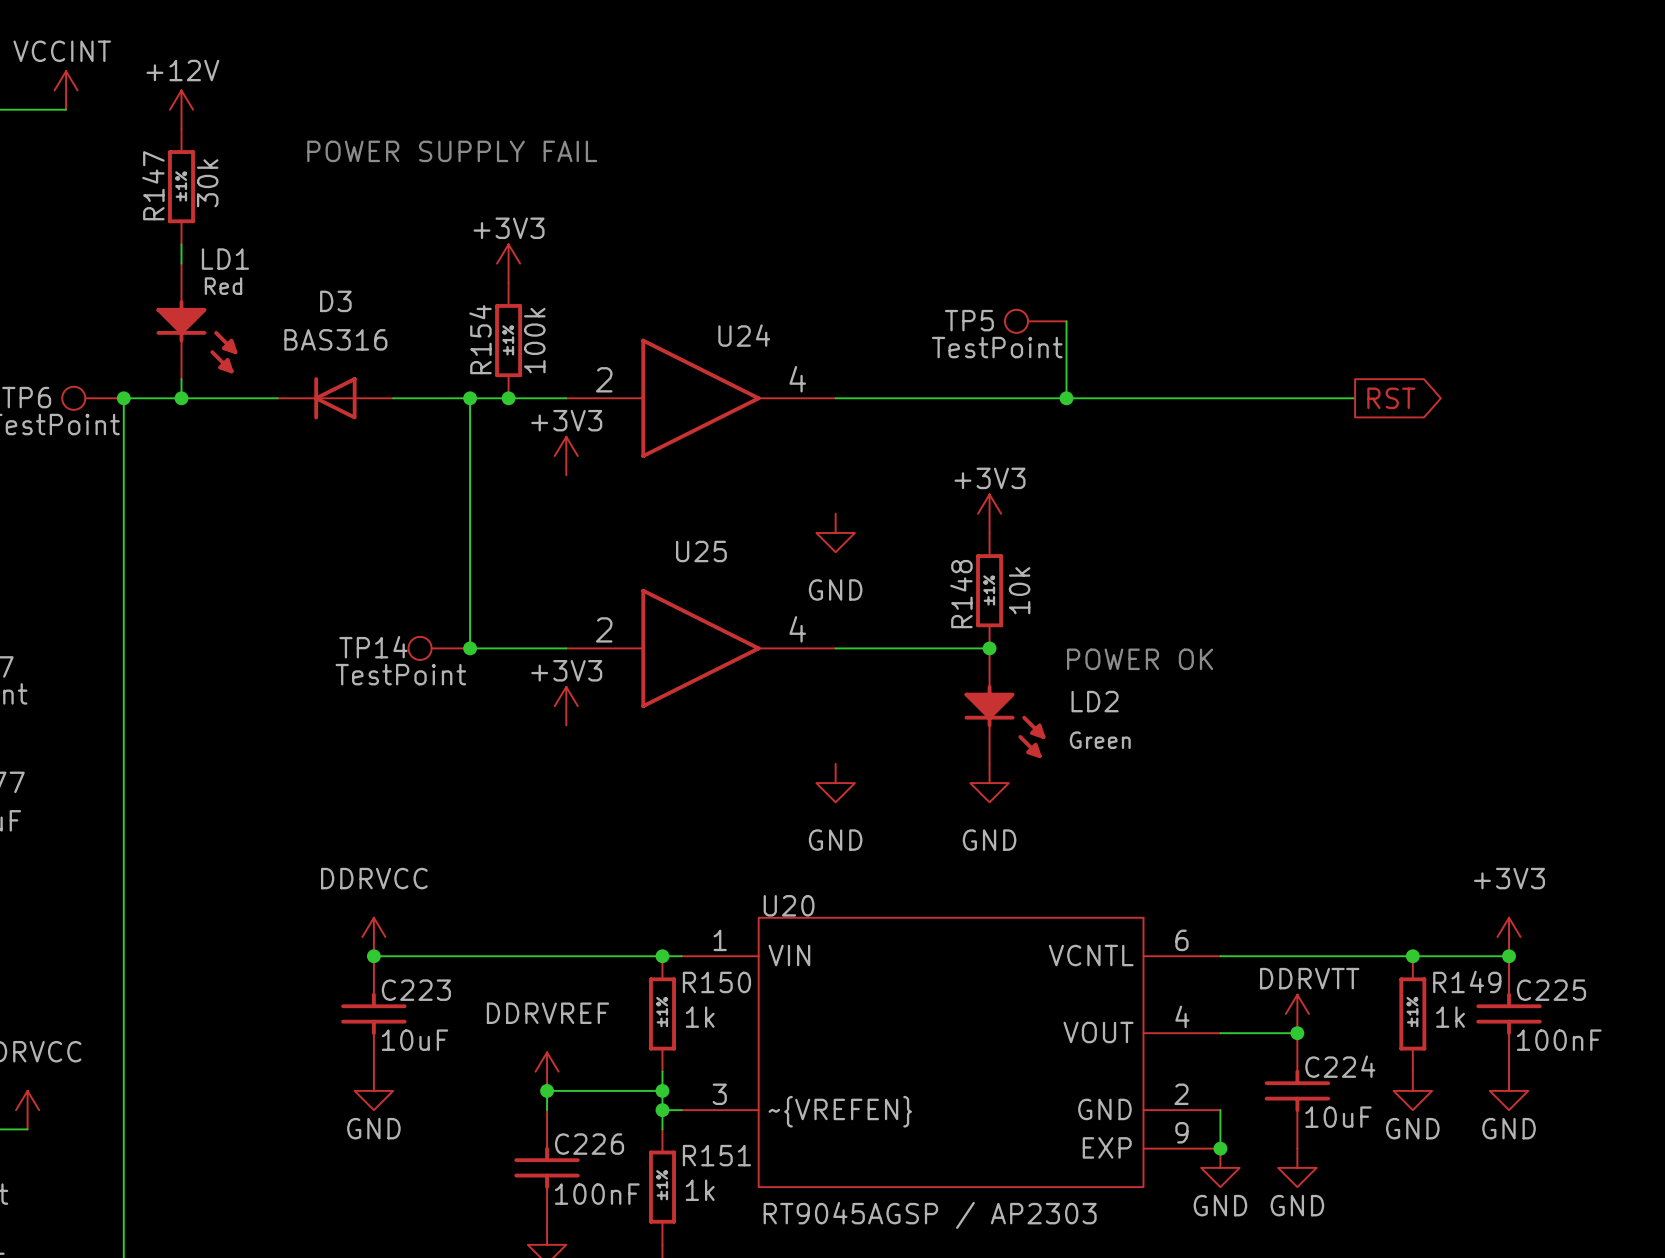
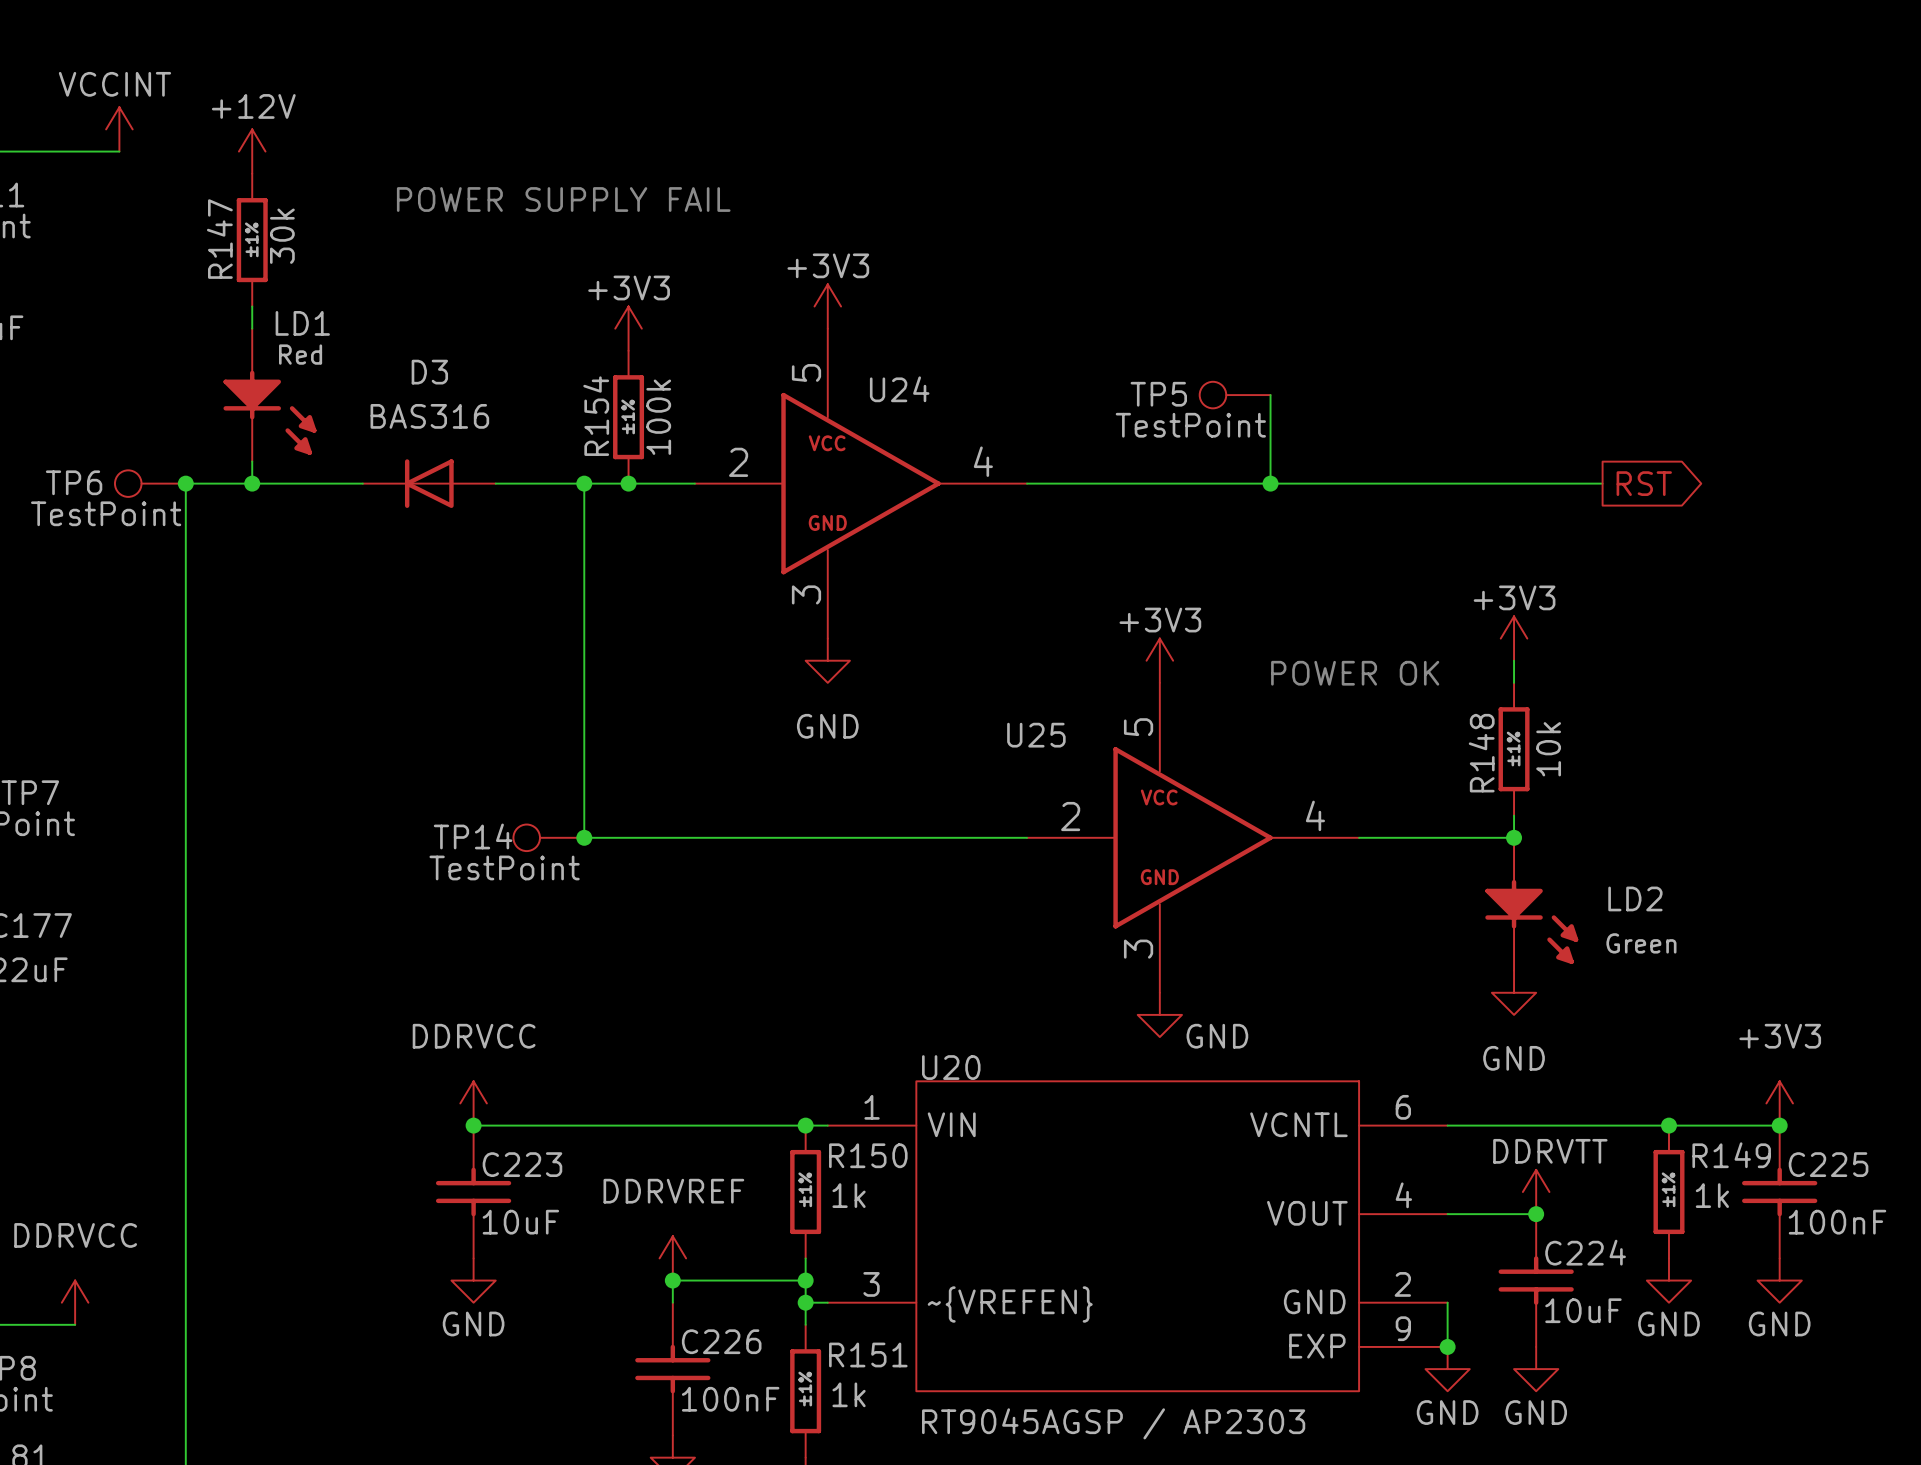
power symbol: none -> +3V3 (827, 306)
U24 symbol: [566, 338, 836, 458] -> [694, 328, 1028, 639]
power symbol: +3V3 (566, 456) -> none
power symbol position: +3V3 (989, 513) -> +3V3 (1159, 660)
power symbol: GND (835, 532) -> none
power symbol: none -> +3V3 (1514, 638)
U25 name position: U25 (701, 551) -> U25 (1036, 735)
power symbol: none -> GND (827, 660)
wire: none -> (1514, 660) (1514, 682)
U25 symbol: [566, 588, 836, 709] -> [1027, 682, 1360, 993]
R148 position: (989, 590) -> (1514, 749)
TP14 position: (439, 648) -> (548, 837)
wire: (470, 648) (566, 648) -> (584, 771) (584, 837) (1027, 837)
junction position: (470, 648) -> (584, 837)
wire: (835, 648) (989, 648) -> none
junction: (989, 648) -> none
text position: POWER OK (1140, 659) -> POWER OK (1355, 673)
wire: none -> (1514, 815) (1514, 837) (1359, 837)
power symbol: +3V3 (566, 706) -> none
LD2 position: (1004, 706) -> (1531, 904)
junction: none -> (1514, 837)
power symbol: GND (835, 783) -> none
power symbol: GND (989, 783) -> none
power symbol: none -> GND (1514, 992)
power symbol: none -> GND (1159, 1014)

